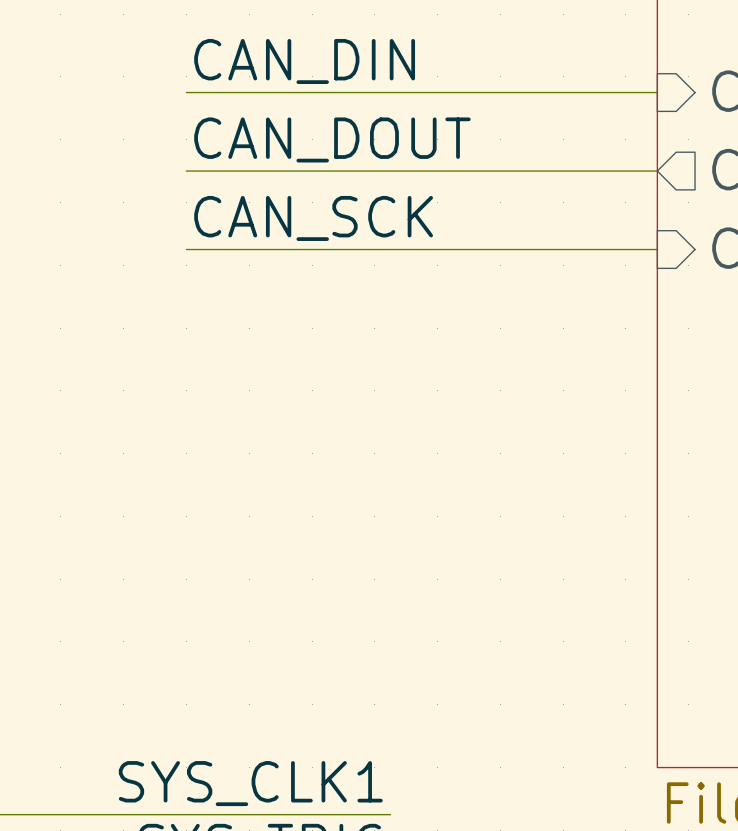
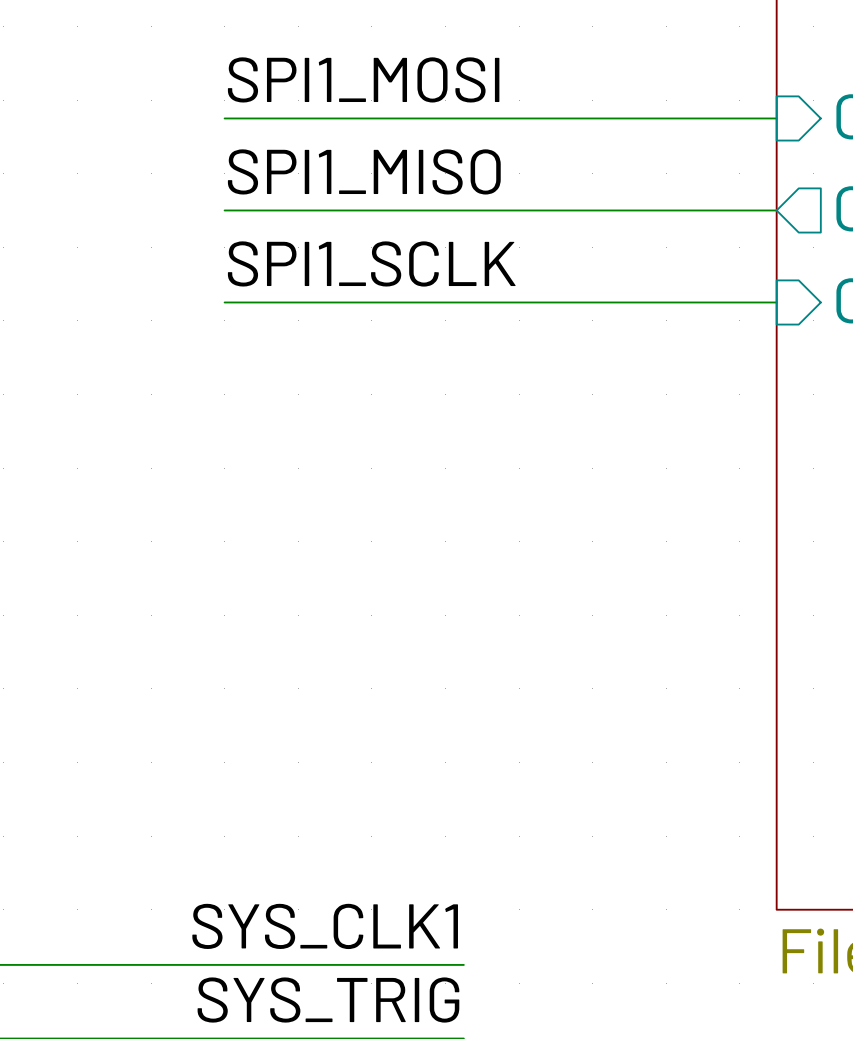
label: CAN_DIN (304, 61) -> SPI1_MOSI (363, 79)
label: CAN_DOUT (332, 139) -> SPI1_MISO (364, 171)
label: CAN_SCK (313, 218) -> SPI1_SCLK (371, 263)

